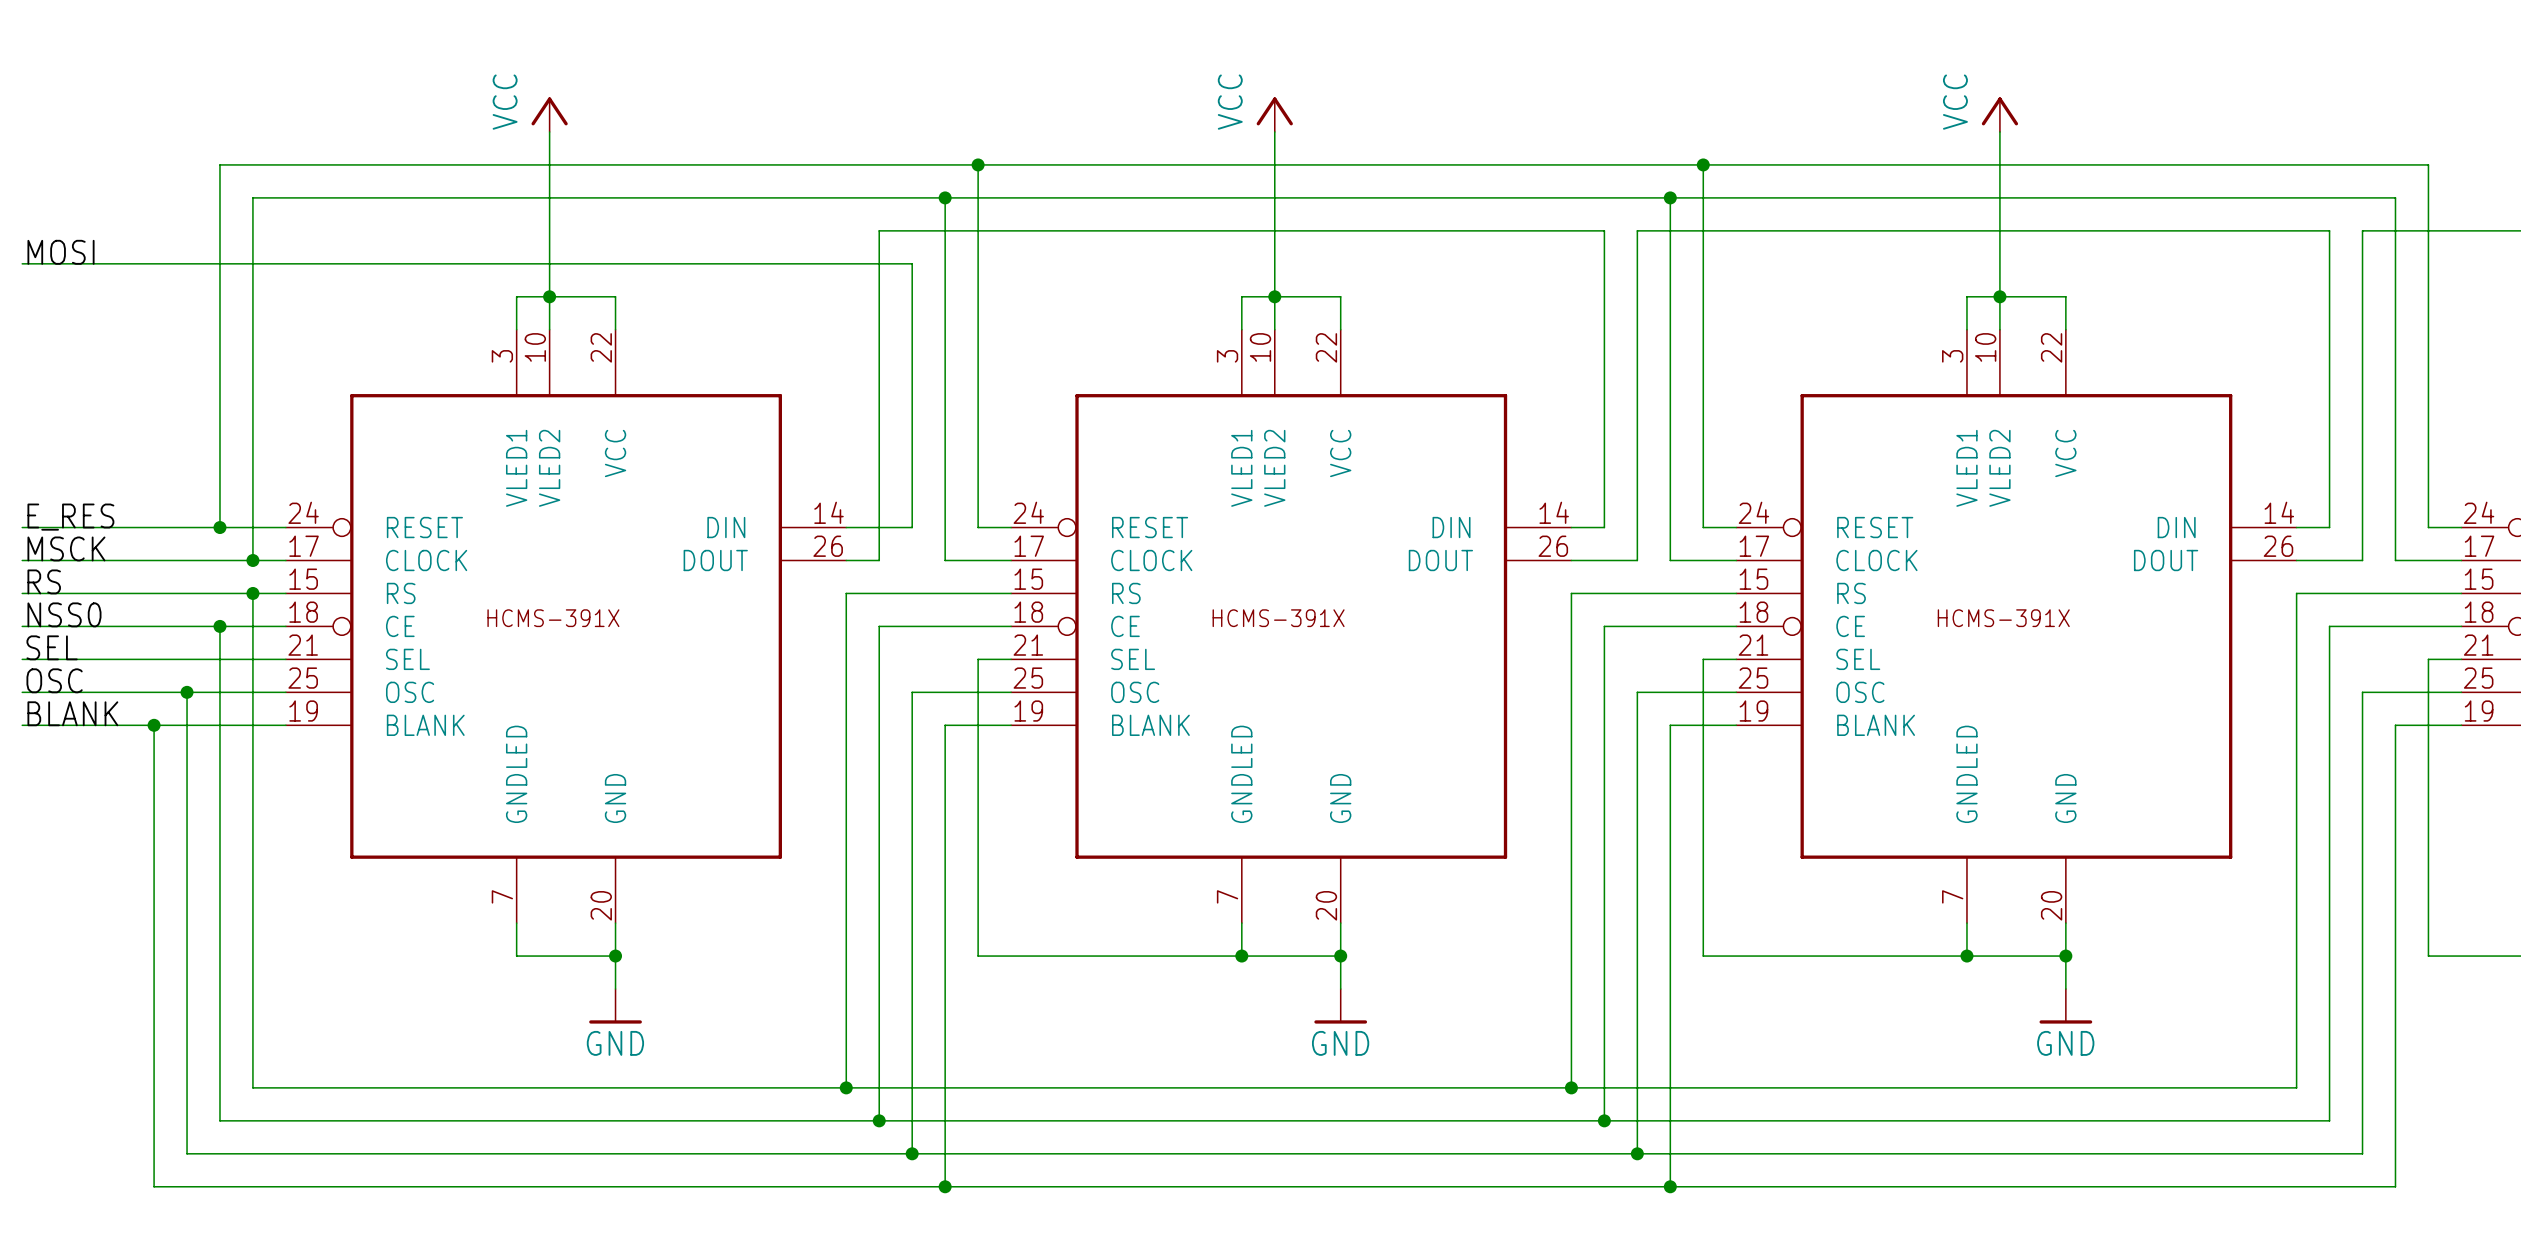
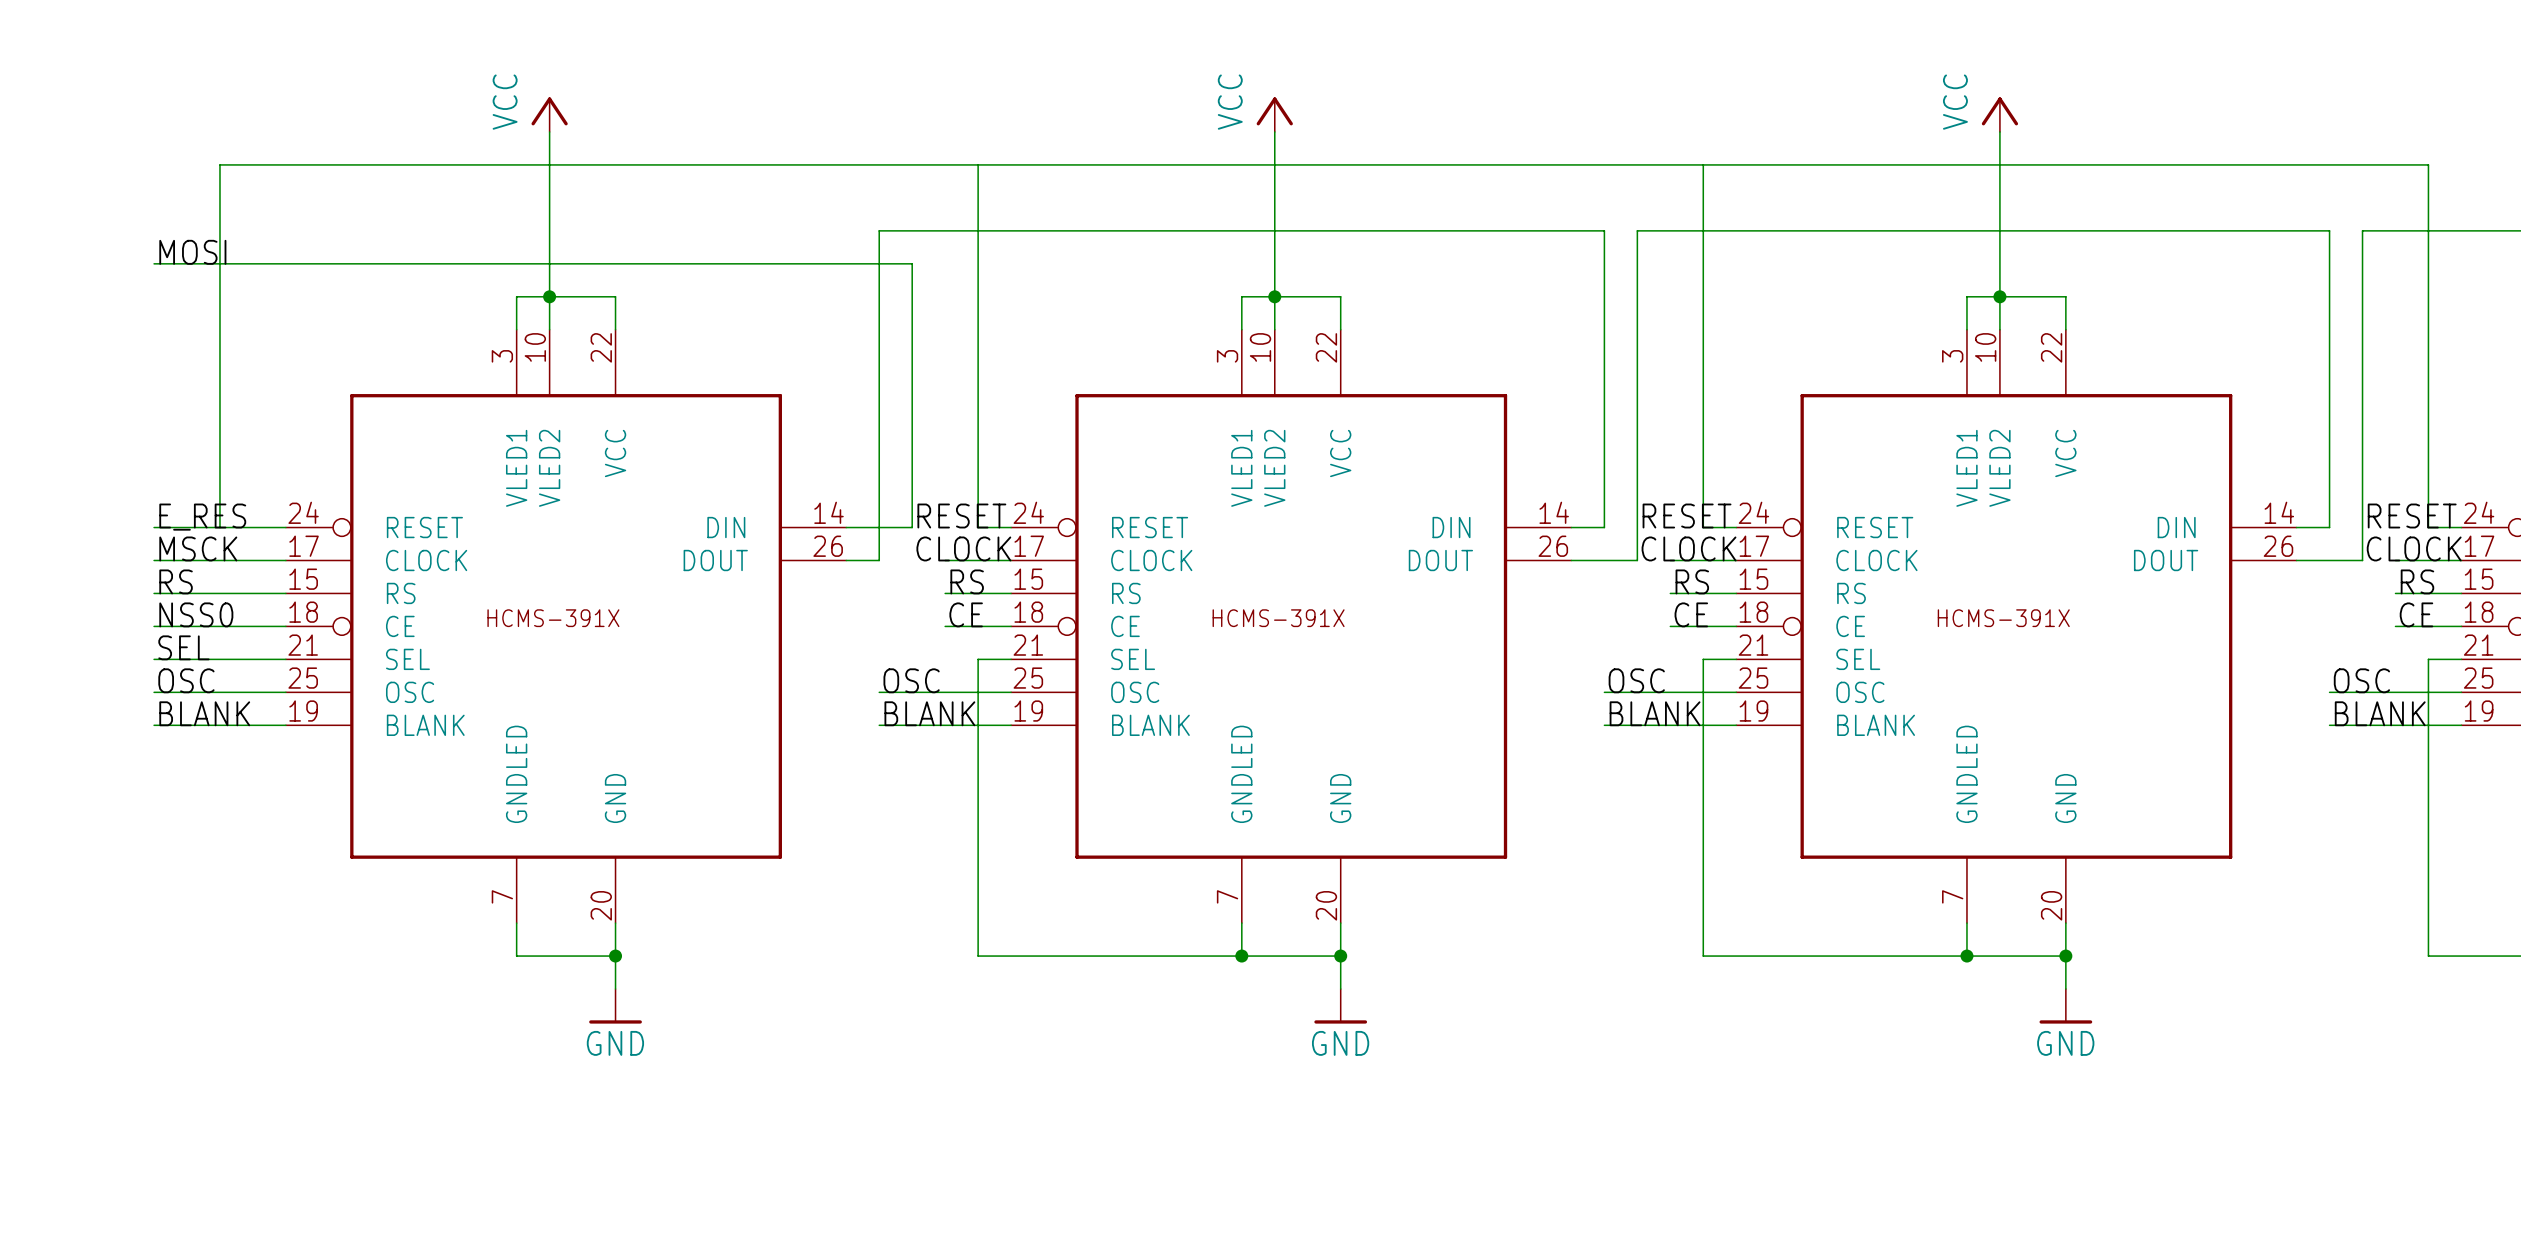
junction: (978, 164) -> none
junction: (1703, 164) -> none
wire: (945, 197) (945, 560) -> none
junction: (945, 197) -> none
wire: (1670, 197) (1670, 560) -> none
junction: (1670, 197) -> none
label position: MOSI (61, 252) -> MOSI (192, 252)
wire: (22, 263) (154, 263) -> none
label: none -> RESET (961, 516)
label: none -> RESET (1687, 516)
label: none -> RESET (2412, 516)
label position: E_RES (70, 517) -> E_RES (202, 517)
wire: (22, 527) (154, 527) -> none
junction: (219, 527) -> none
label position: MSCK (66, 548) -> MSCK (198, 548)
label: none -> CLOCK (963, 548)
label: none -> CLOCK (1689, 548)
label: none -> CLOCK (2414, 548)
wire: (22, 560) (154, 560) -> none
wire: (252, 560) (252, 197) (2395, 197) (2395, 560) -> none
junction: (252, 560) -> none
label position: RS (44, 581) -> RS (176, 581)
label: none -> RS (967, 581)
label: none -> RS (1692, 581)
label: none -> RS (2417, 581)
wire: (22, 593) (154, 593) -> none
wire: (252, 593) (252, 1087) (2296, 1087) (2296, 593) (2395, 593) -> none
junction: (252, 593) -> none
wire: (945, 593) (846, 593) (846, 1087) -> none
wire: (1670, 593) (1571, 593) (1571, 1087) -> none
label position: NSS0 (64, 614) -> NSS0 (196, 614)
label: none -> CE (966, 614)
label: none -> CE (1691, 614)
label: none -> CE (2416, 614)
wire: (22, 626) (154, 626) -> none
wire: (219, 626) (219, 1120) (2329, 1120) (2329, 626) (2395, 626) -> none
junction: (219, 626) -> none
wire: (945, 626) (879, 626) (879, 1120) -> none
wire: (1670, 626) (1604, 626) (1604, 1120) -> none
label position: SEL (52, 647) -> SEL (183, 647)
wire: (22, 659) (154, 659) -> none
label position: OSC (54, 680) -> OSC (186, 680)
label: none -> OSC (911, 680)
label: none -> OSC (1636, 680)
label: none -> OSC (2361, 680)
wire: (22, 692) (154, 692) -> none
wire: (187, 692) (187, 1153) (2362, 1153) (2362, 692) -> (2329, 692) (2362, 692)
junction: (187, 692) -> none
wire: (912, 692) (912, 1153) -> (912, 692) (879, 692)
wire: (1637, 692) (1637, 1153) -> (1637, 692) (1604, 692)
label position: BLANK (72, 713) -> BLANK (204, 713)
label: none -> BLANK (929, 713)
label: none -> BLANK (1655, 713)
label: none -> BLANK (2380, 713)
wire: (22, 725) (154, 725) (154, 1186) (2395, 1186) (2395, 725) -> (2329, 725) (2395, 725)
junction: (154, 725) -> none
wire: (945, 725) (945, 1186) -> (945, 725) (879, 725)
wire: (1670, 725) (1670, 1186) -> (1670, 725) (1604, 725)
junction: (846, 1087) -> none
junction: (1571, 1087) -> none
junction: (879, 1120) -> none
junction: (1604, 1120) -> none
junction: (912, 1153) -> none
junction: (1637, 1153) -> none
junction: (945, 1186) -> none
junction: (1670, 1186) -> none

